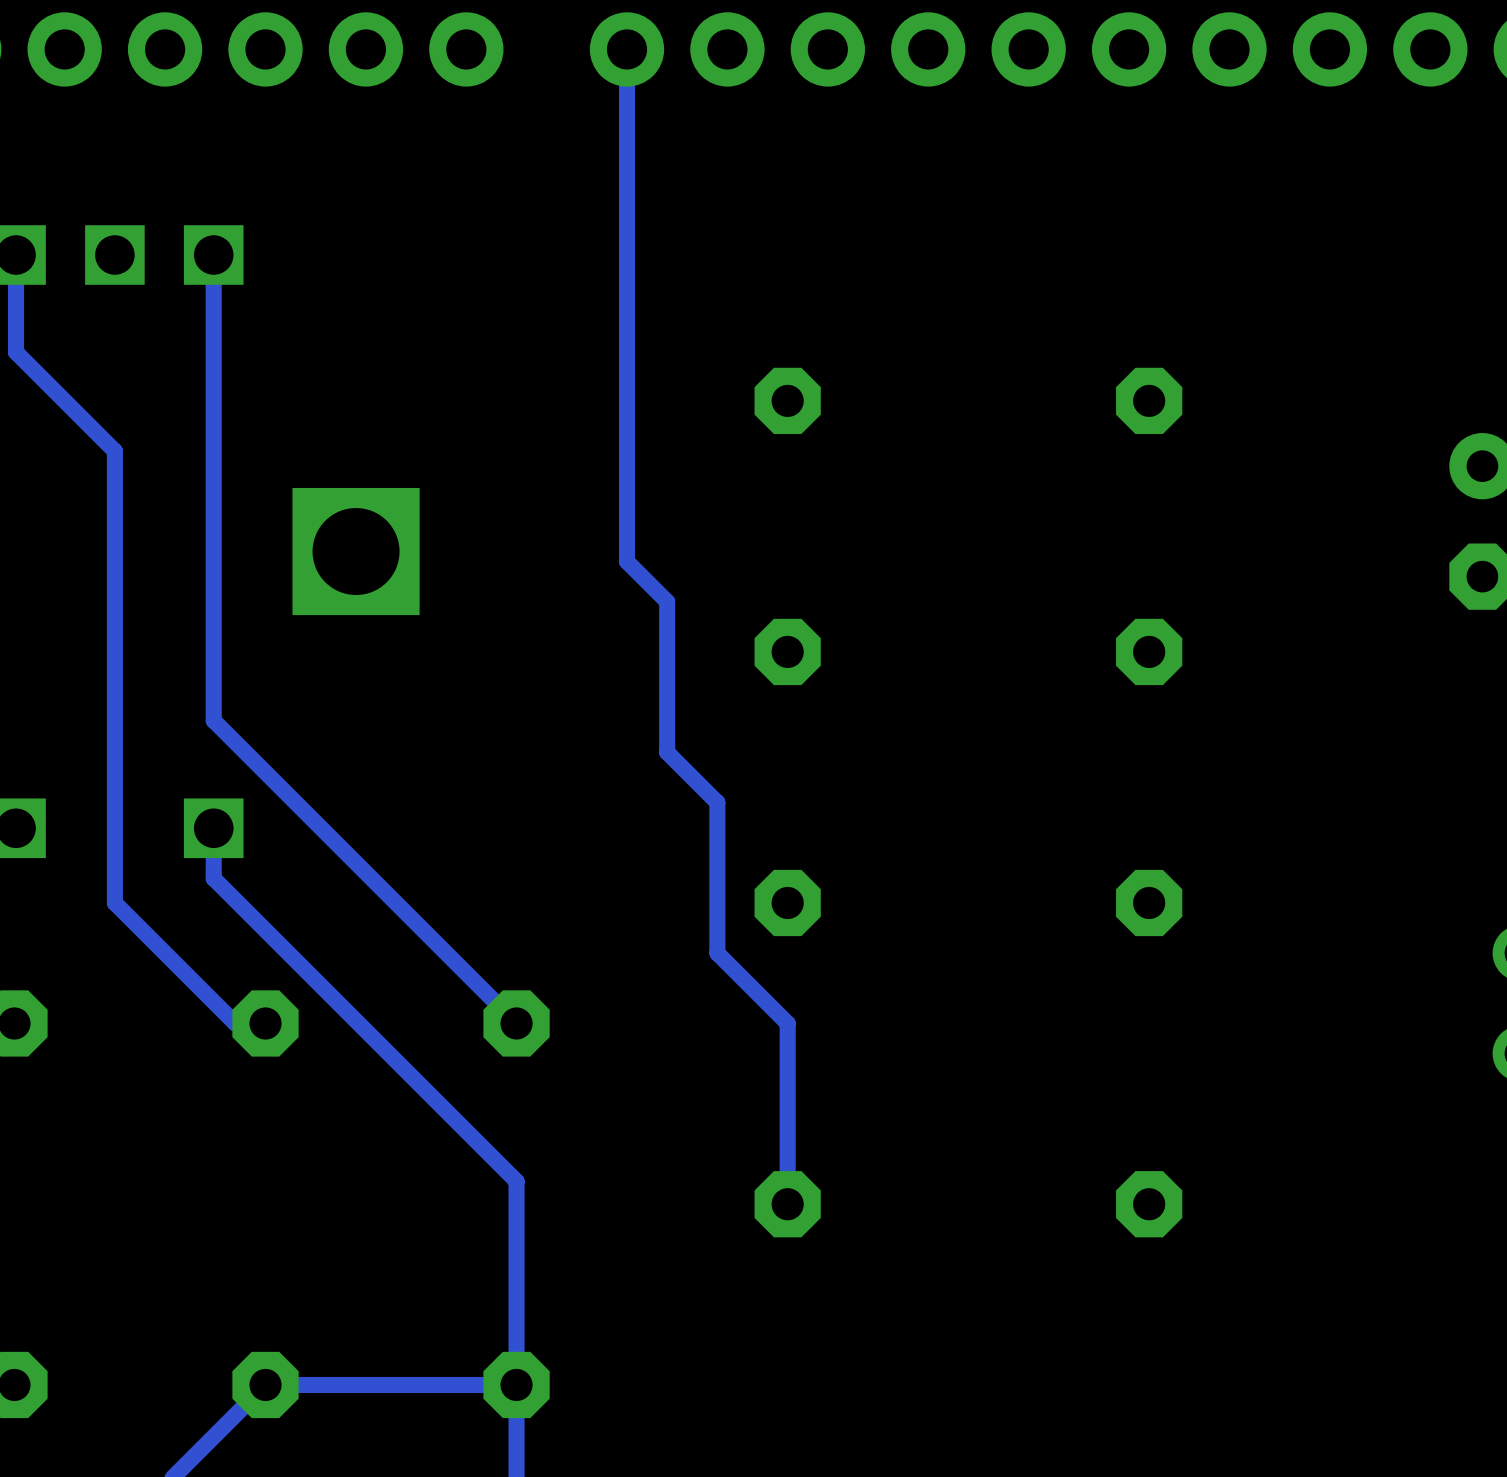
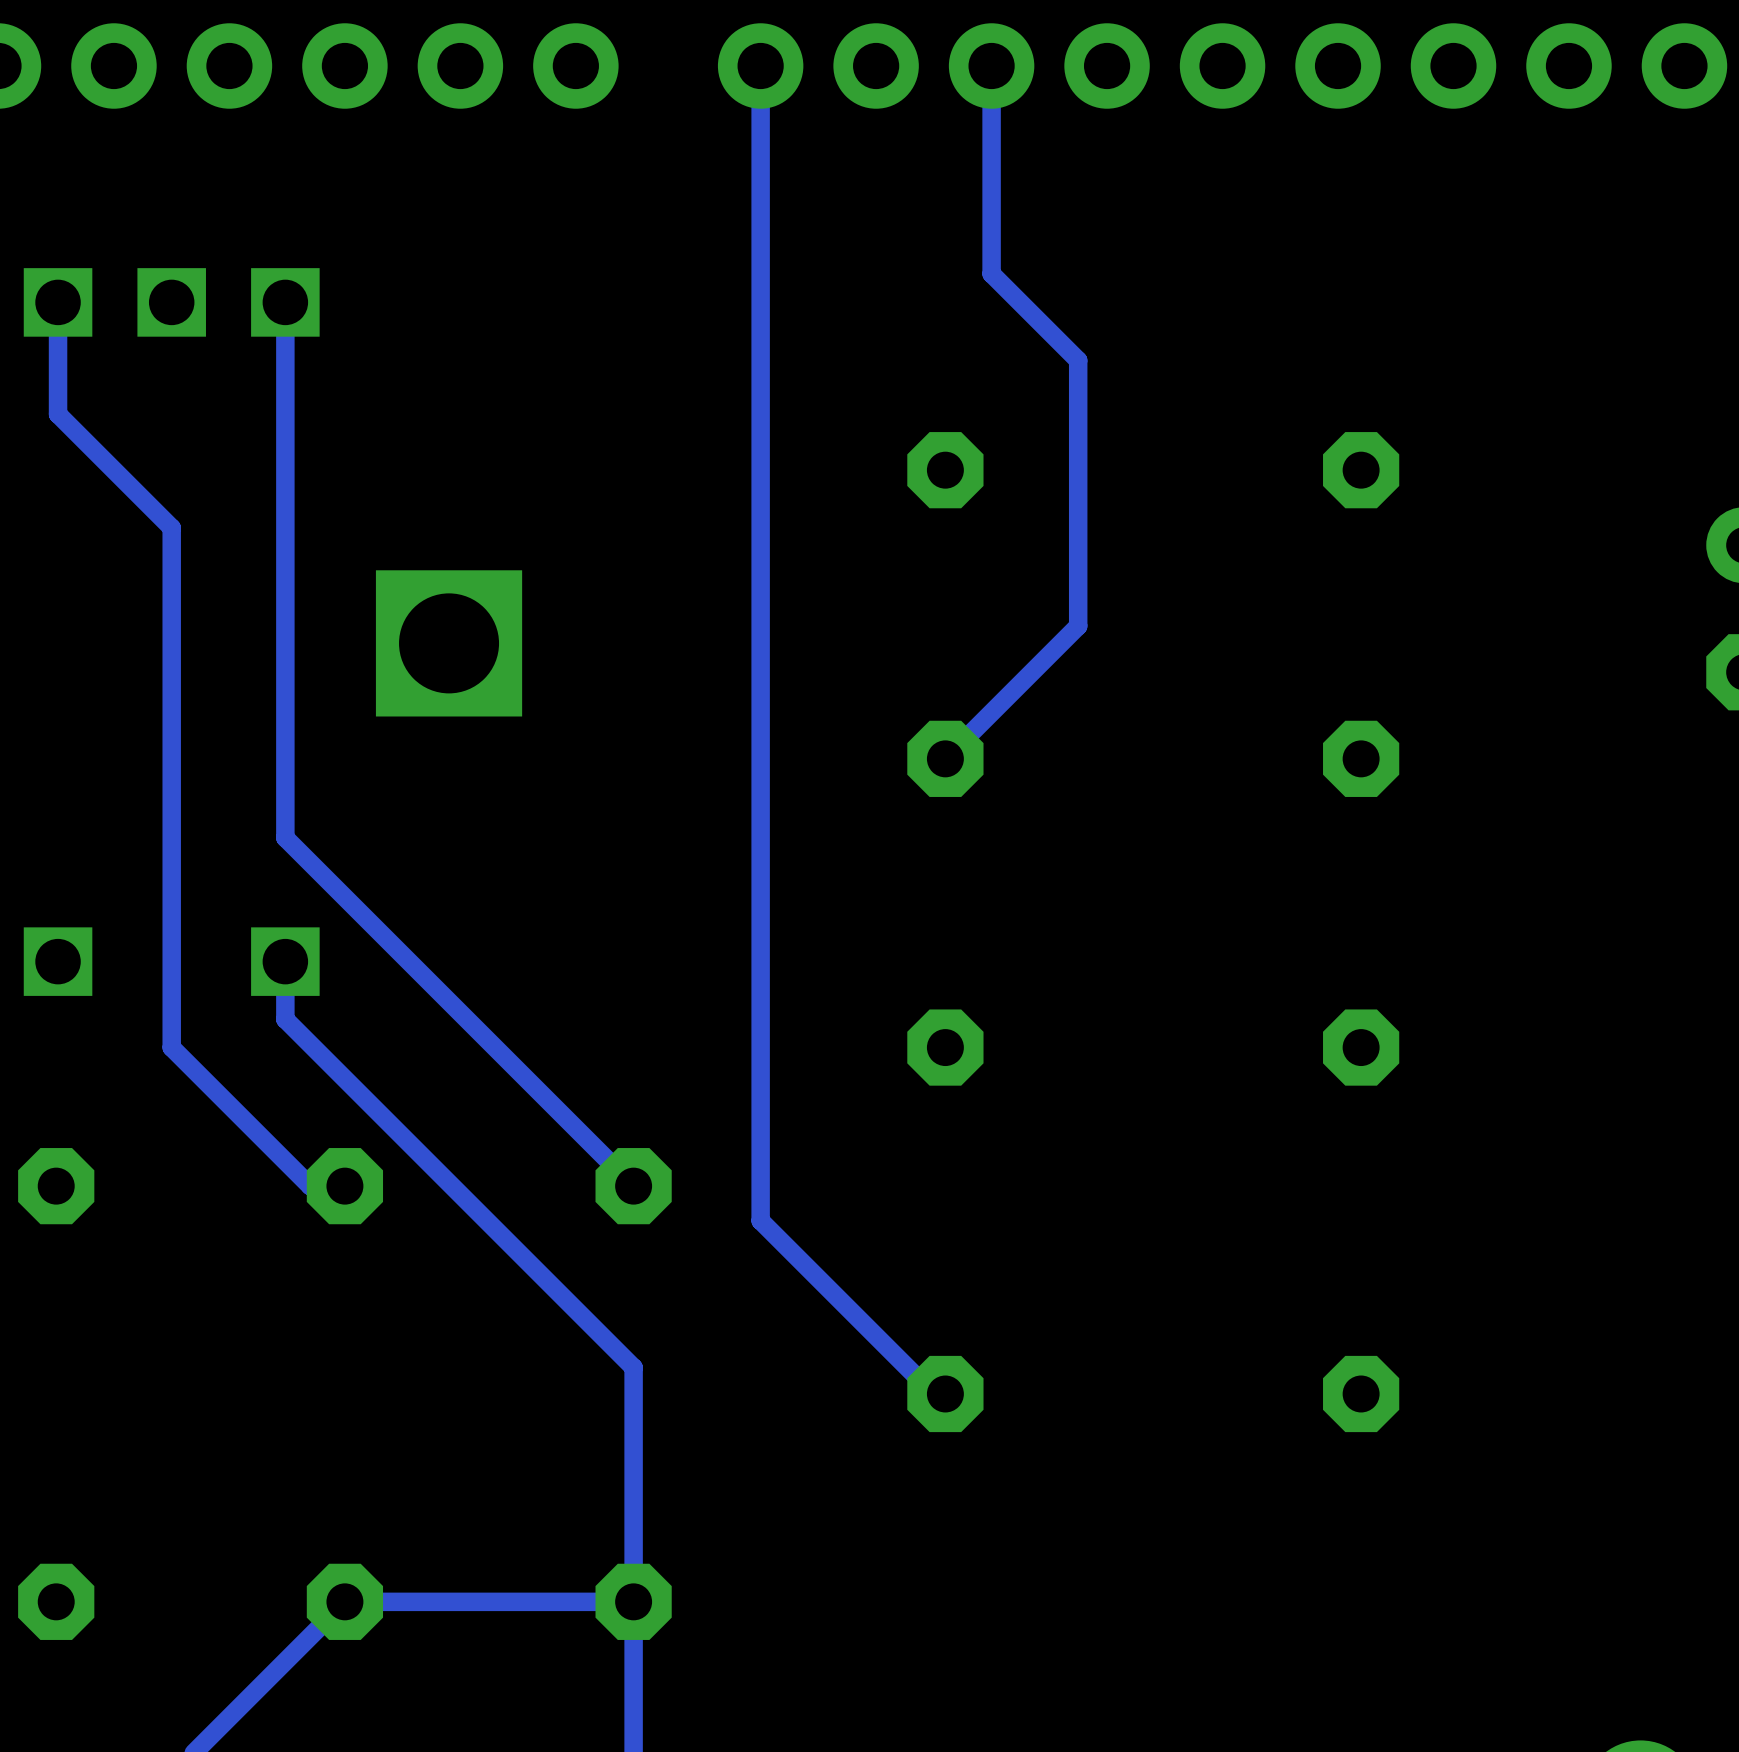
track: none -> (991, 66) (991, 273) (1078, 360) (1078, 626) (945, 758)
track: (627, 561) (667, 601) (667, 752) (717, 802) (717, 953) (787, 1023) (787, 1204) -> (760, 654) (760, 1220) (933, 1393) (945, 1393)

